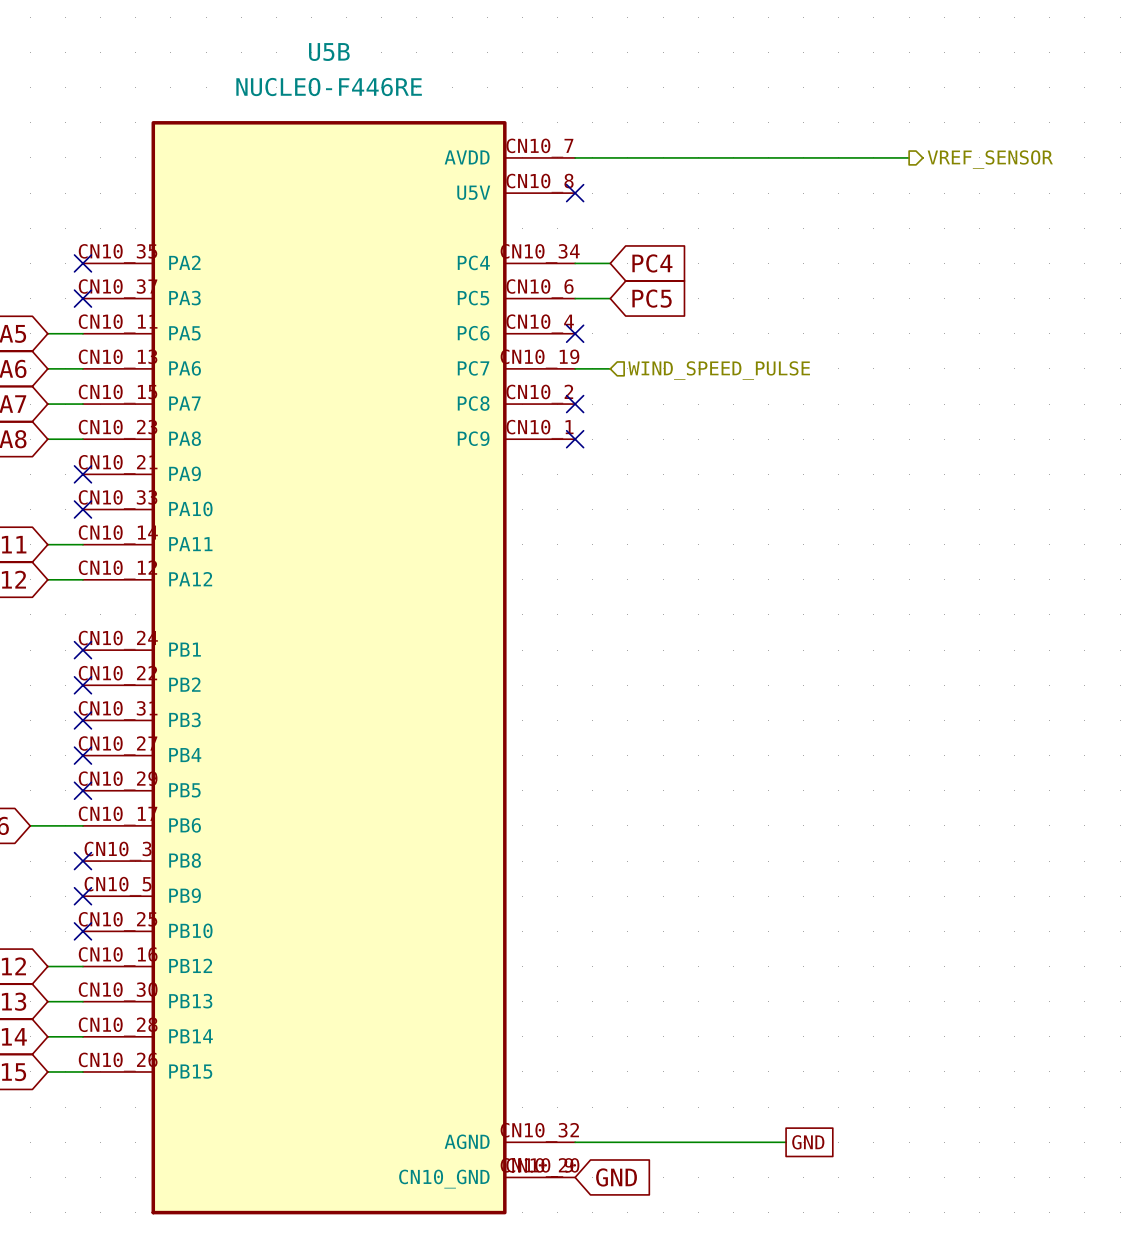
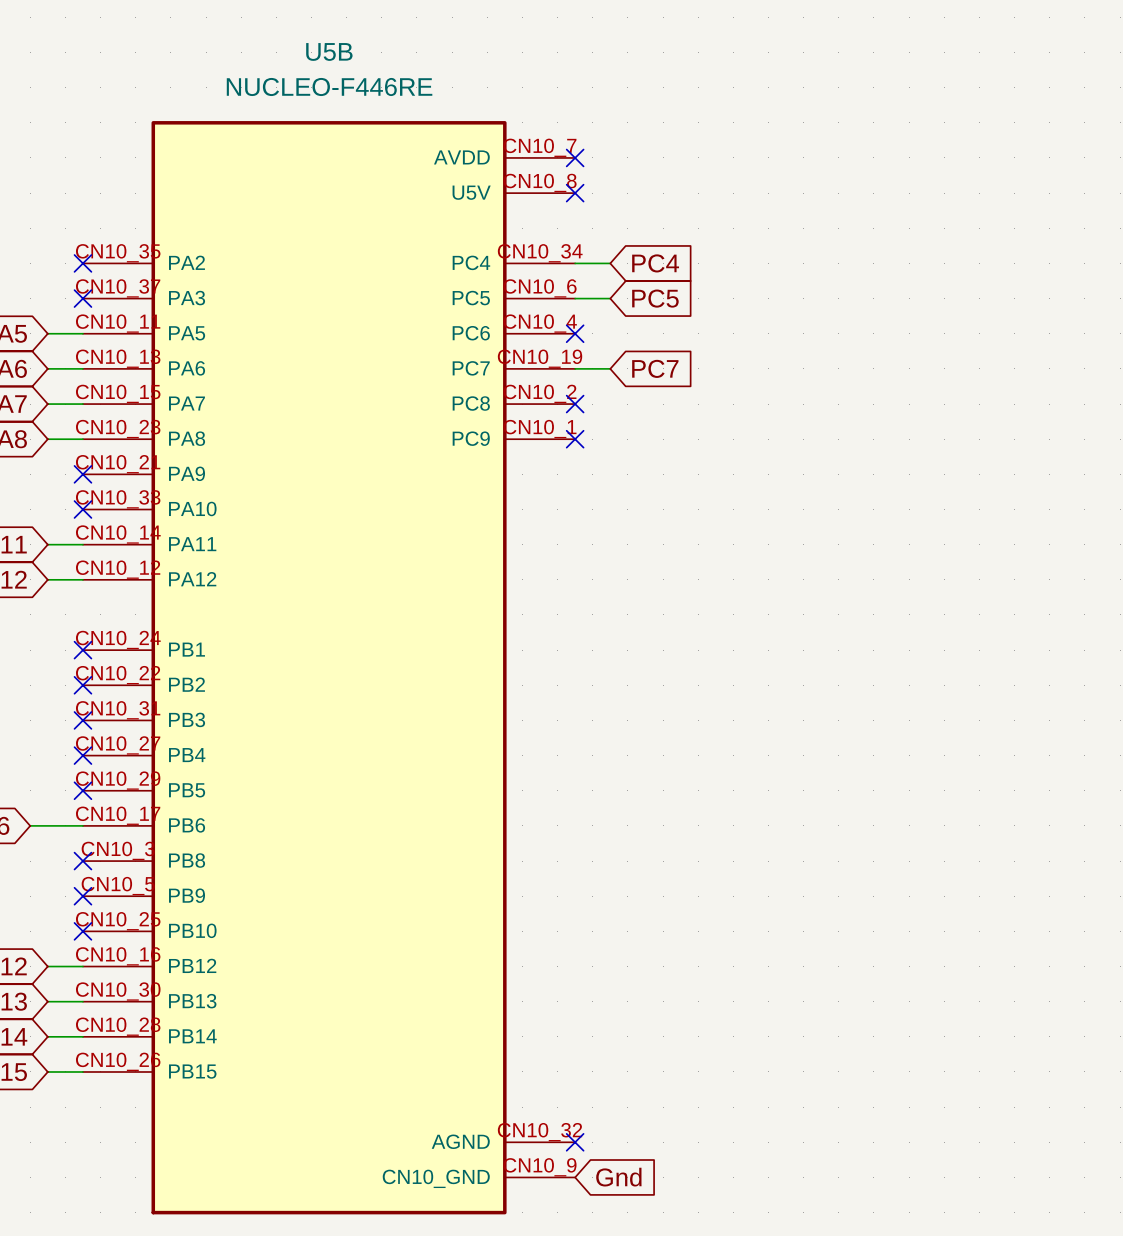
U5B symbol: [82, 121, 576, 1215] -> [82, 121, 576, 1215]
wire: (575, 157) (909, 157) -> none
no-connect mark: none -> (575, 157)
hierarchical label: VREF_SENSOR (990, 159) -> none
global label: none -> PC7 (655, 368)
hierarchical label: WIND_SPEED_PULSE (719, 370) -> none
wire: (575, 1142) (786, 1142) -> none
no-connect mark: none -> (575, 1142)
global label: GND (808, 1142) -> none
global label: GND (616, 1177) -> Gnd (618, 1177)

